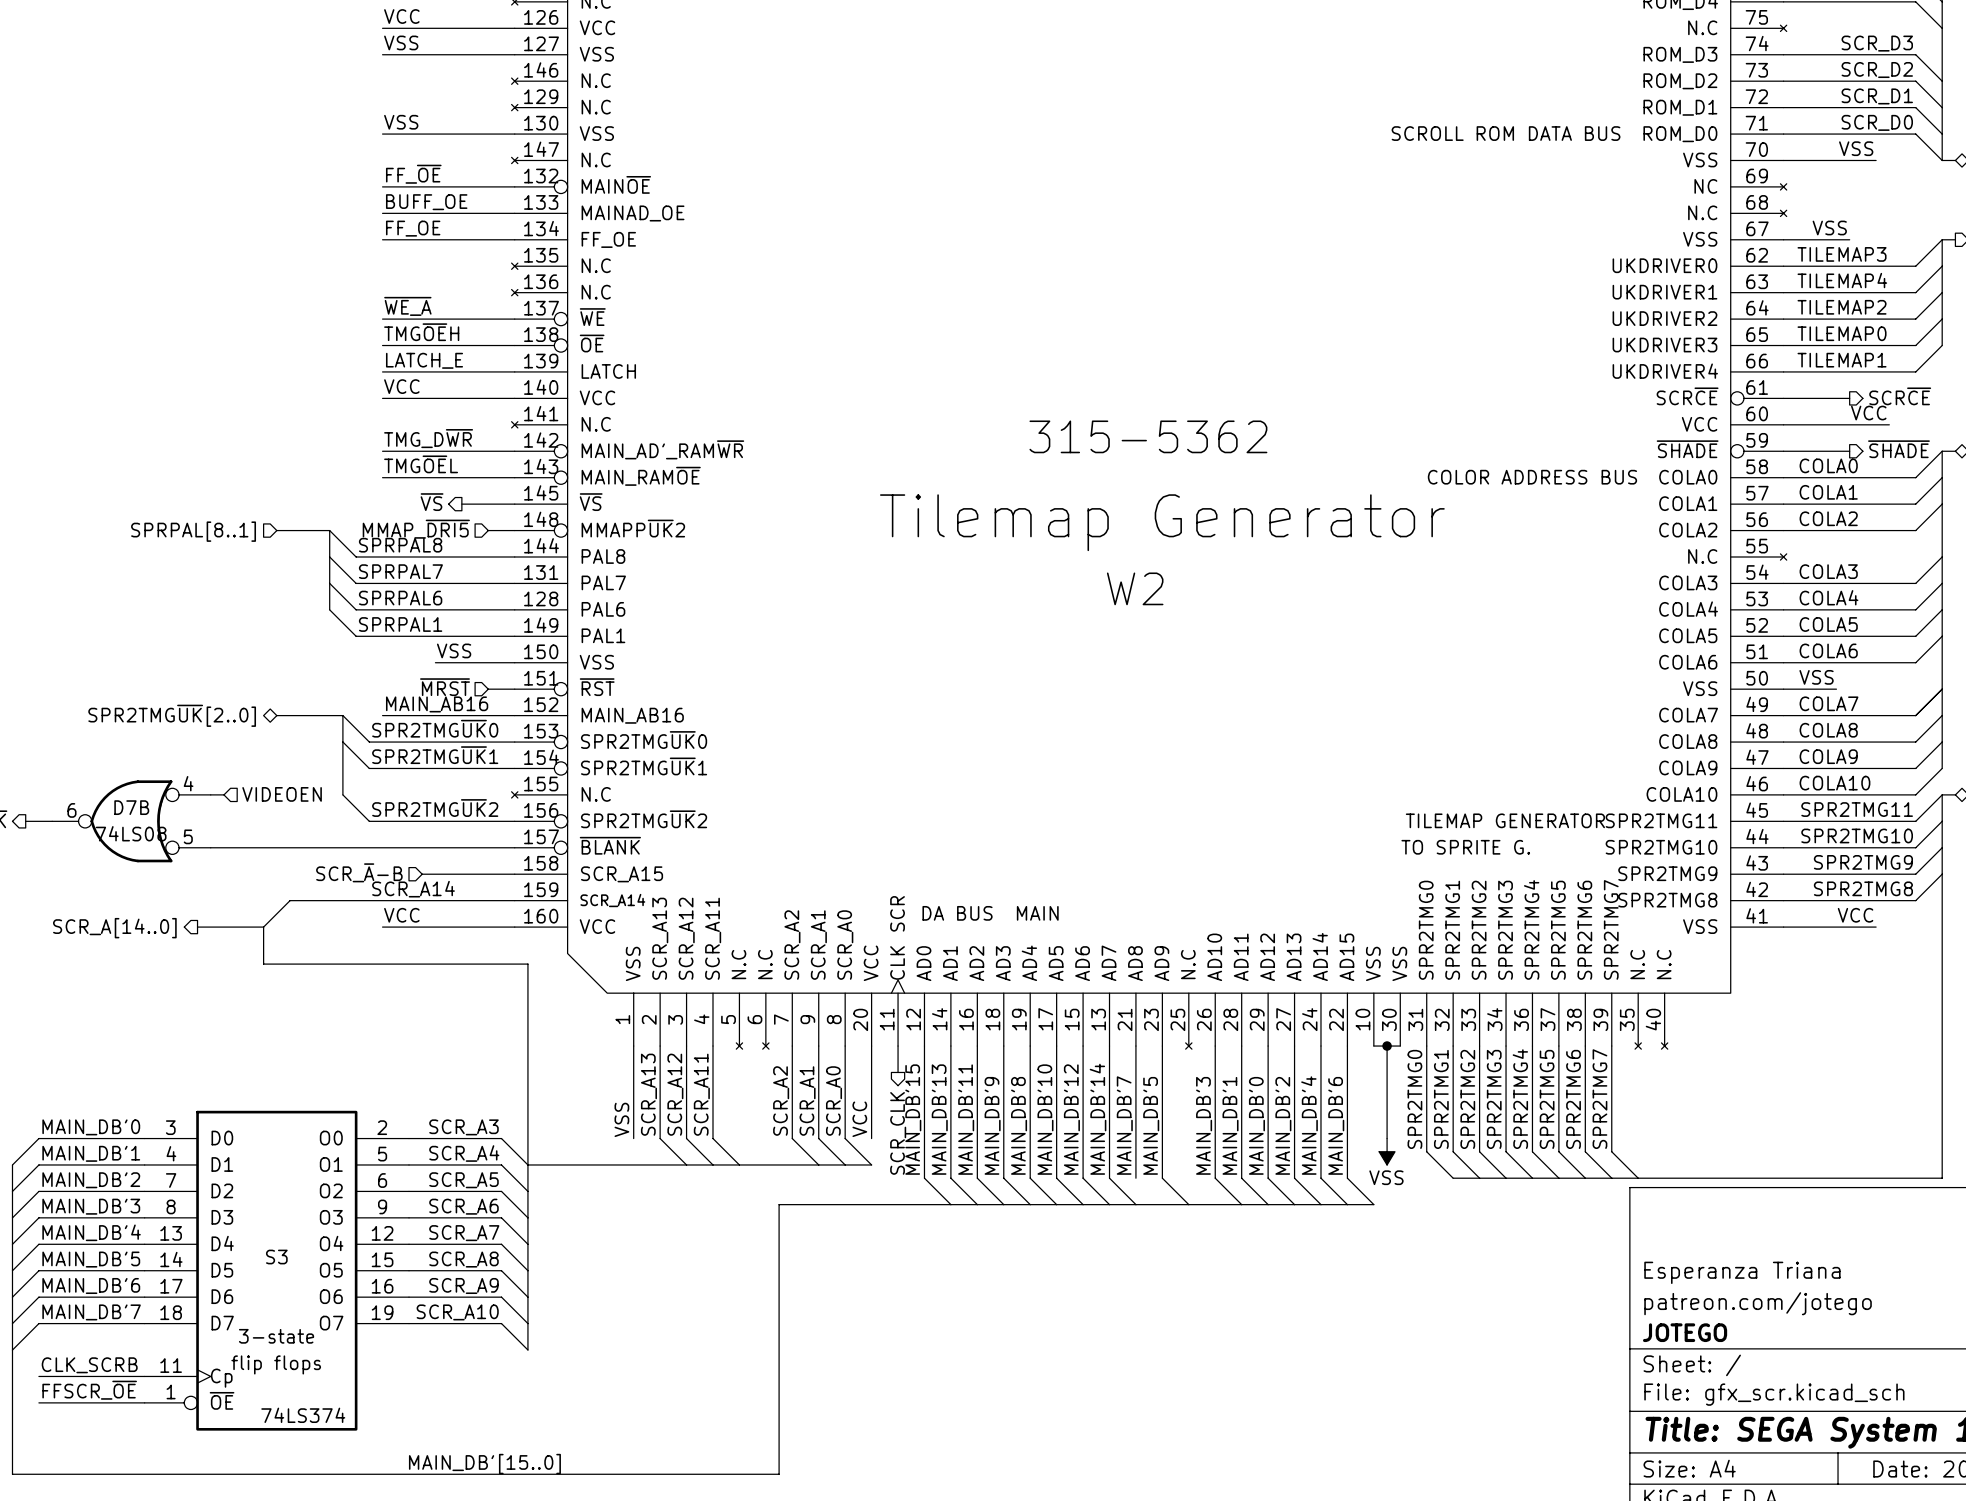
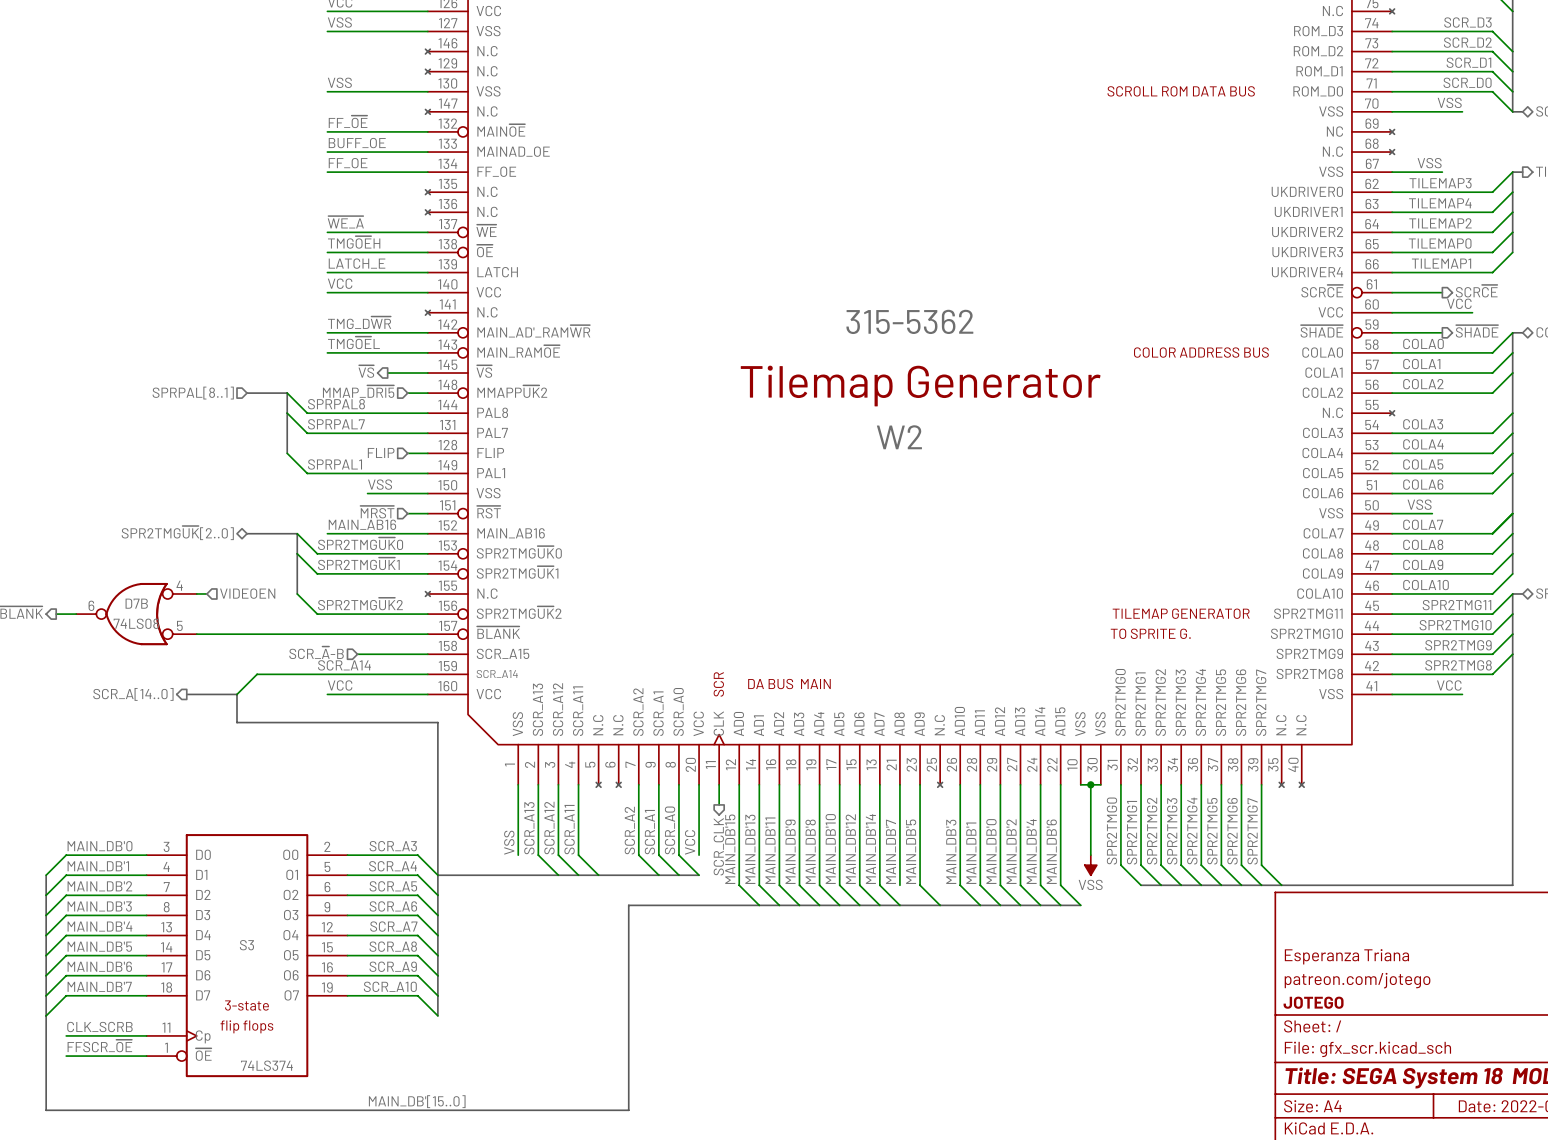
wire: (329, 583) (356, 609) (488, 609) -> none
label: SPRPAL6 (400, 598) -> none
hierarchical label: none -> FLIP (381, 452)
W2 pin name: PAL6 (603, 609) -> FLIP (490, 452)

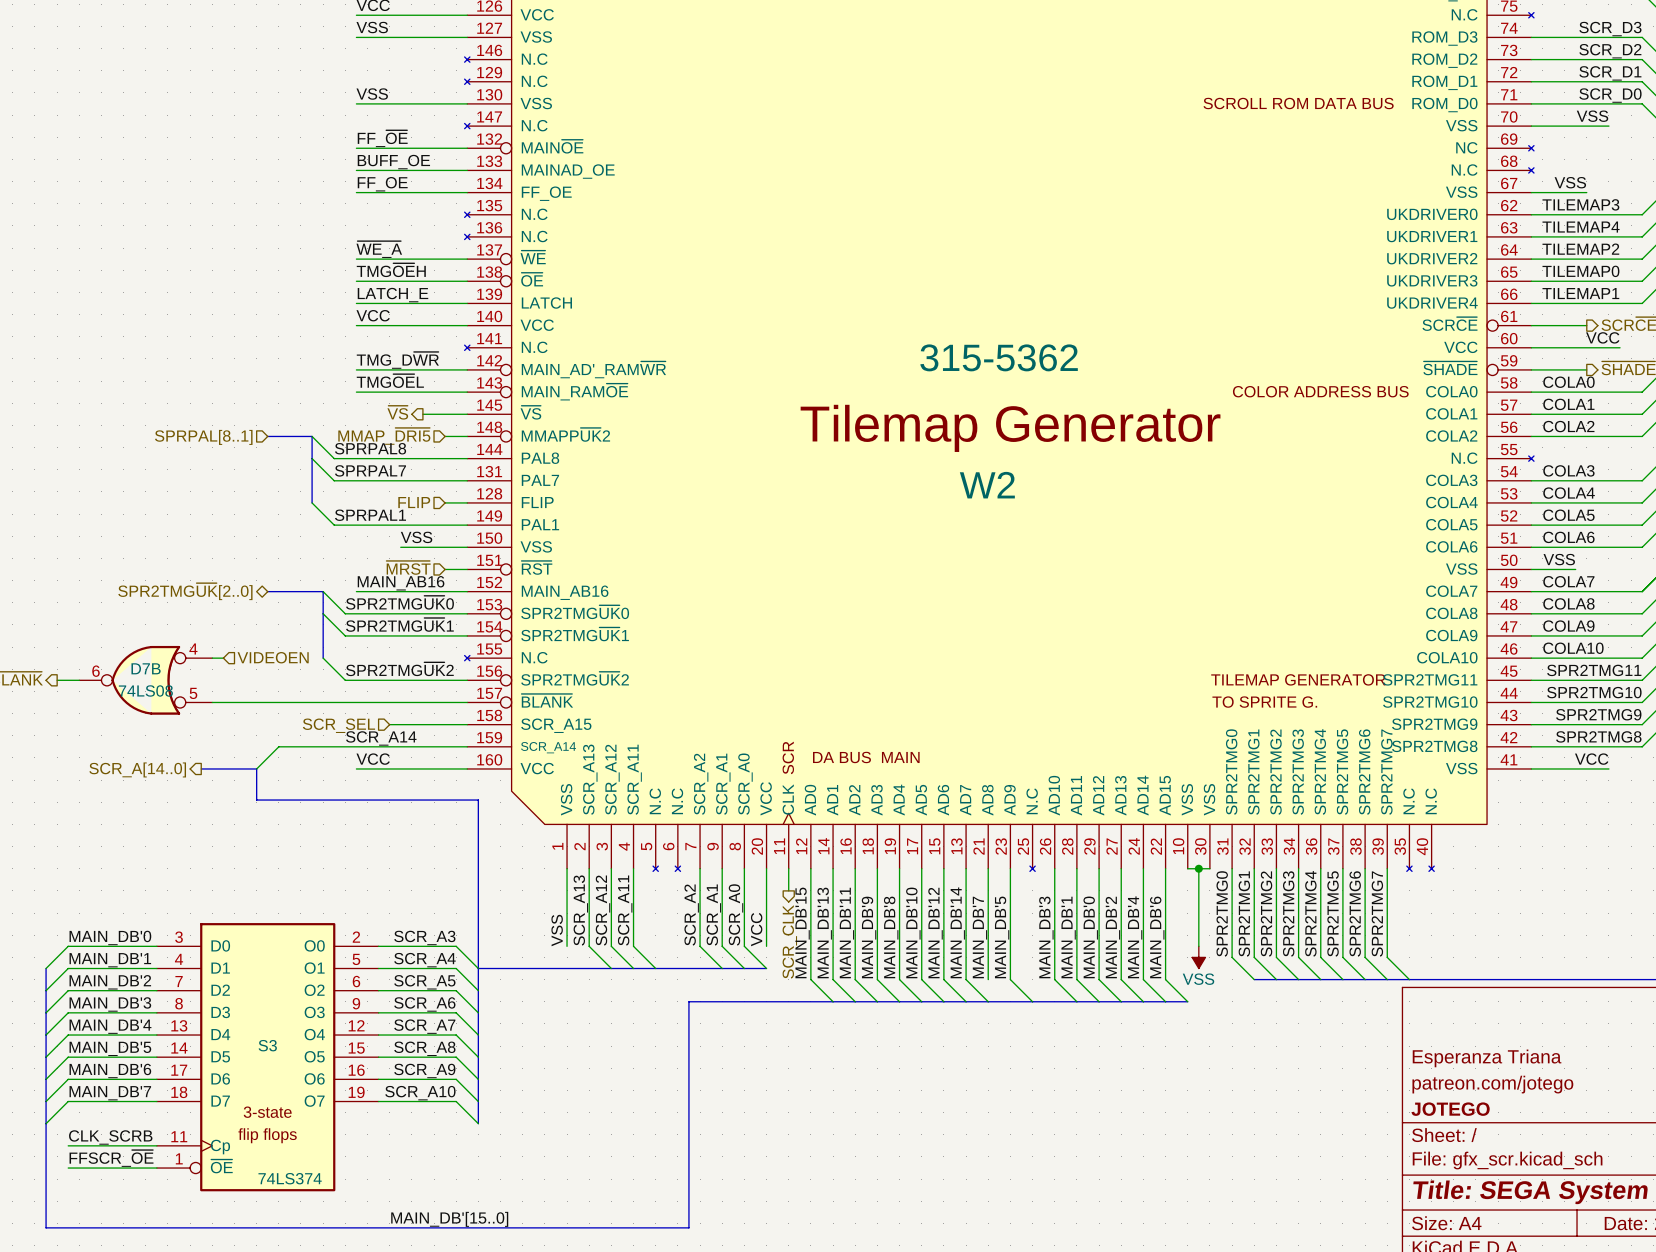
hierarchical label: SCR_~{A}-B (316, 652) -> SCR_SEL (338, 725)

